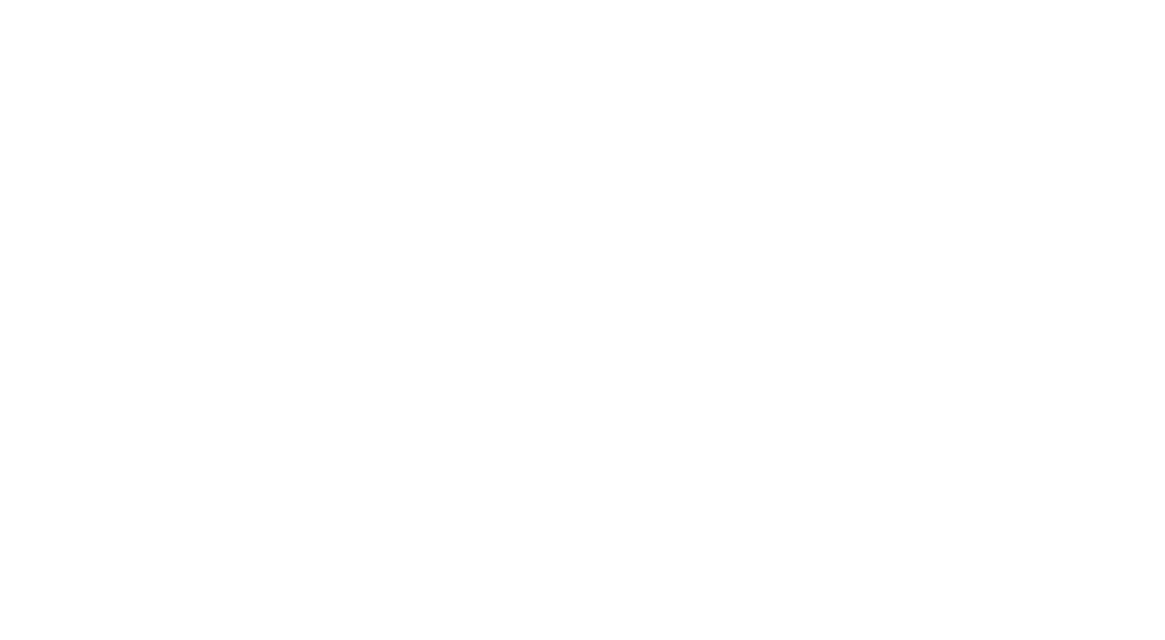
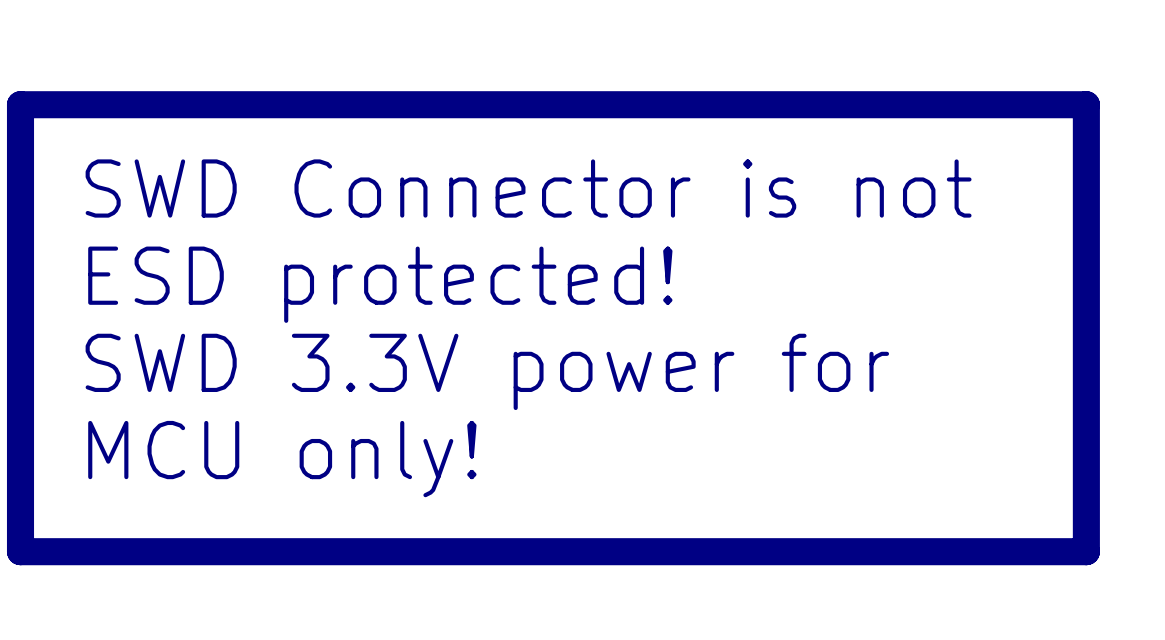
line: none -> (20, 104) (1086, 104) (1086, 551) (20, 551) (20, 104)
text: none -> SWD Connector is not (528, 188)
text: none -> ESD protected! (380, 284)
text: none -> SWD 3.3V power for (487, 371)
text: none -> MCU only! (282, 459)

